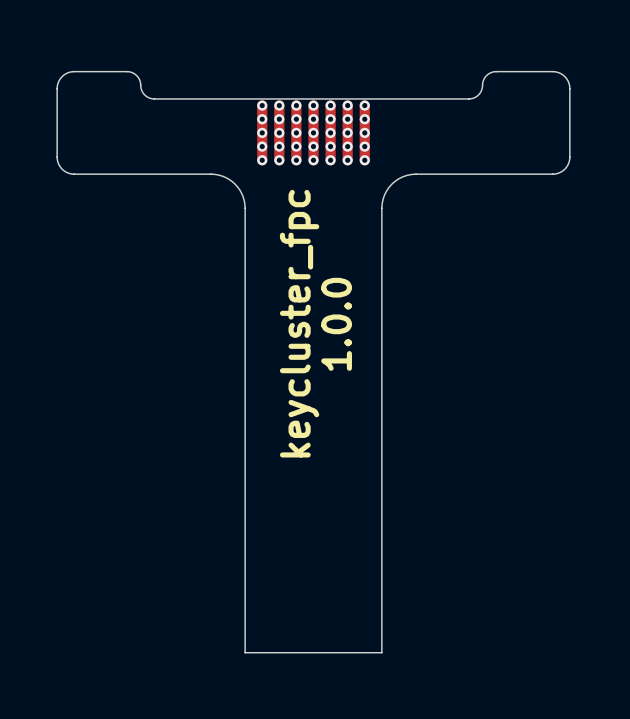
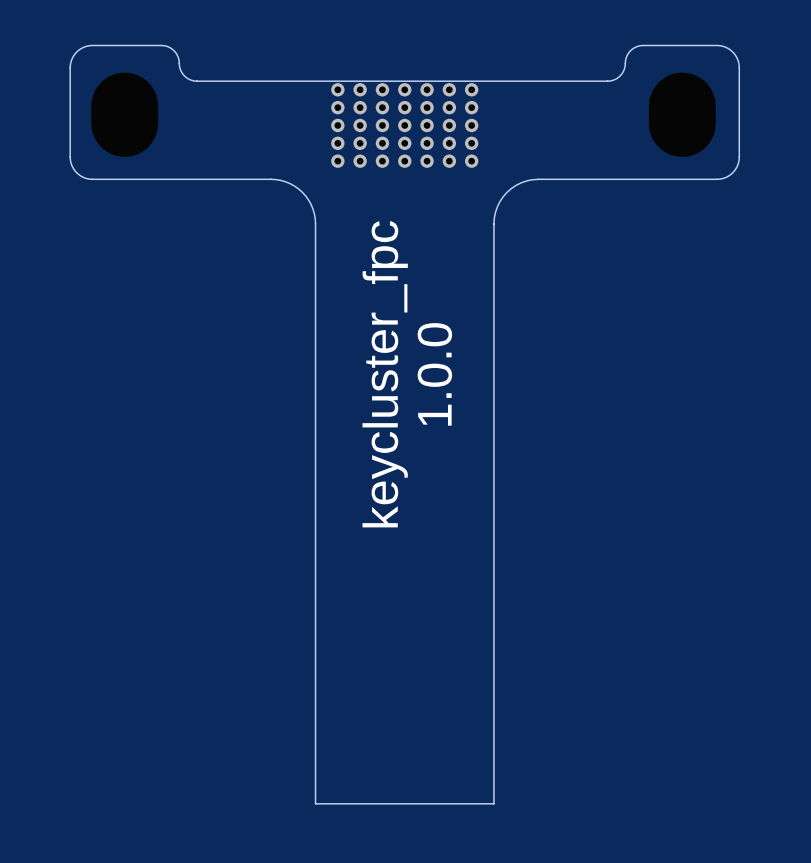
track: (262, 105) (262, 160) -> none
track: (279, 105) (279, 160) -> none
track: (296, 105) (296, 160) -> none
track: (313, 105) (313, 160) -> none
track: (330, 105) (330, 160) -> none
track: (347, 105) (347, 160) -> none
track: (364, 105) (364, 160) -> none

